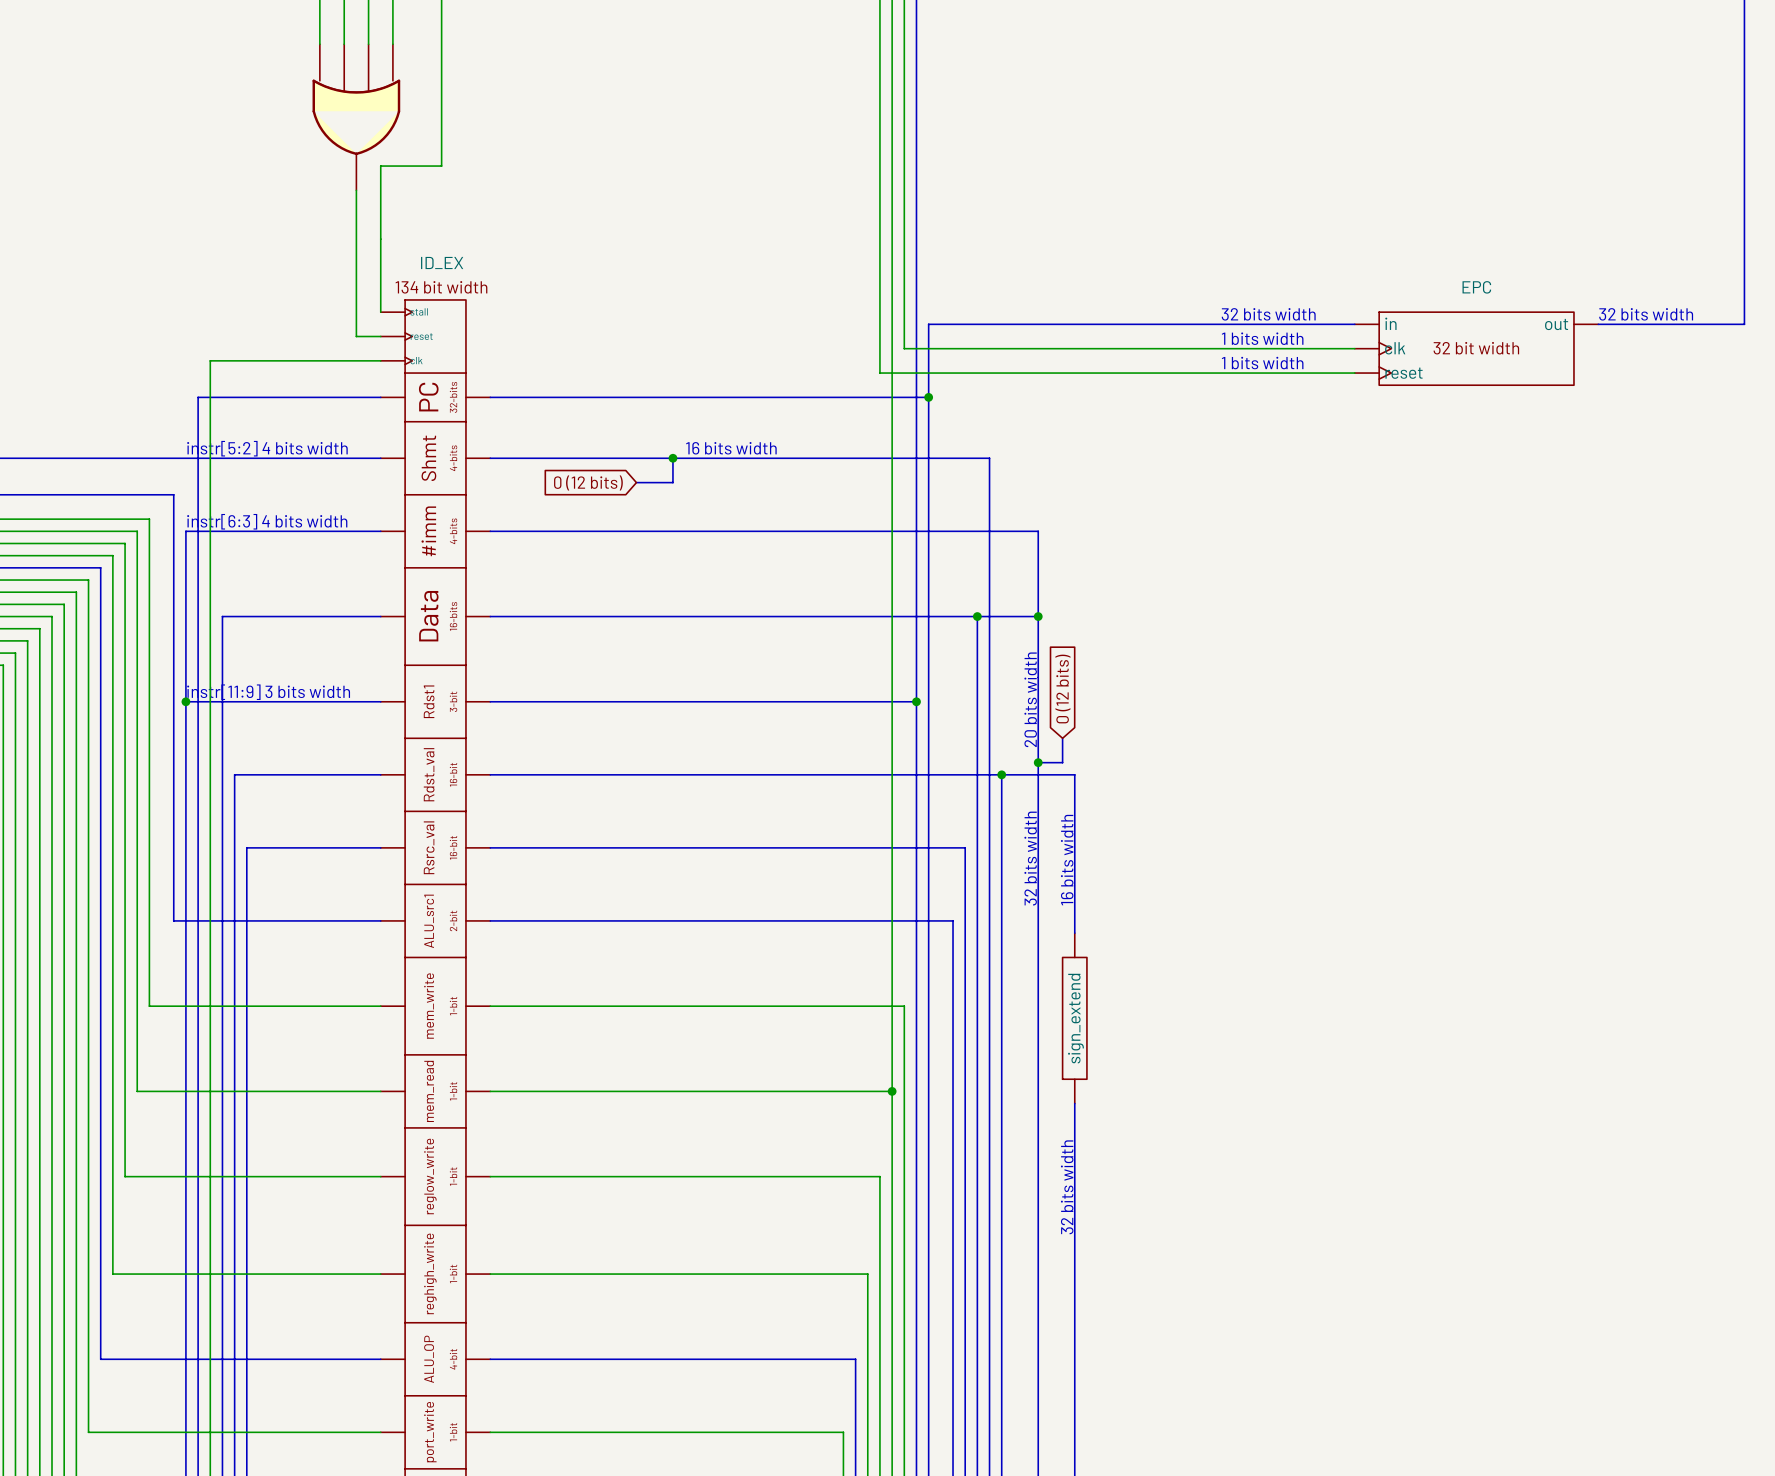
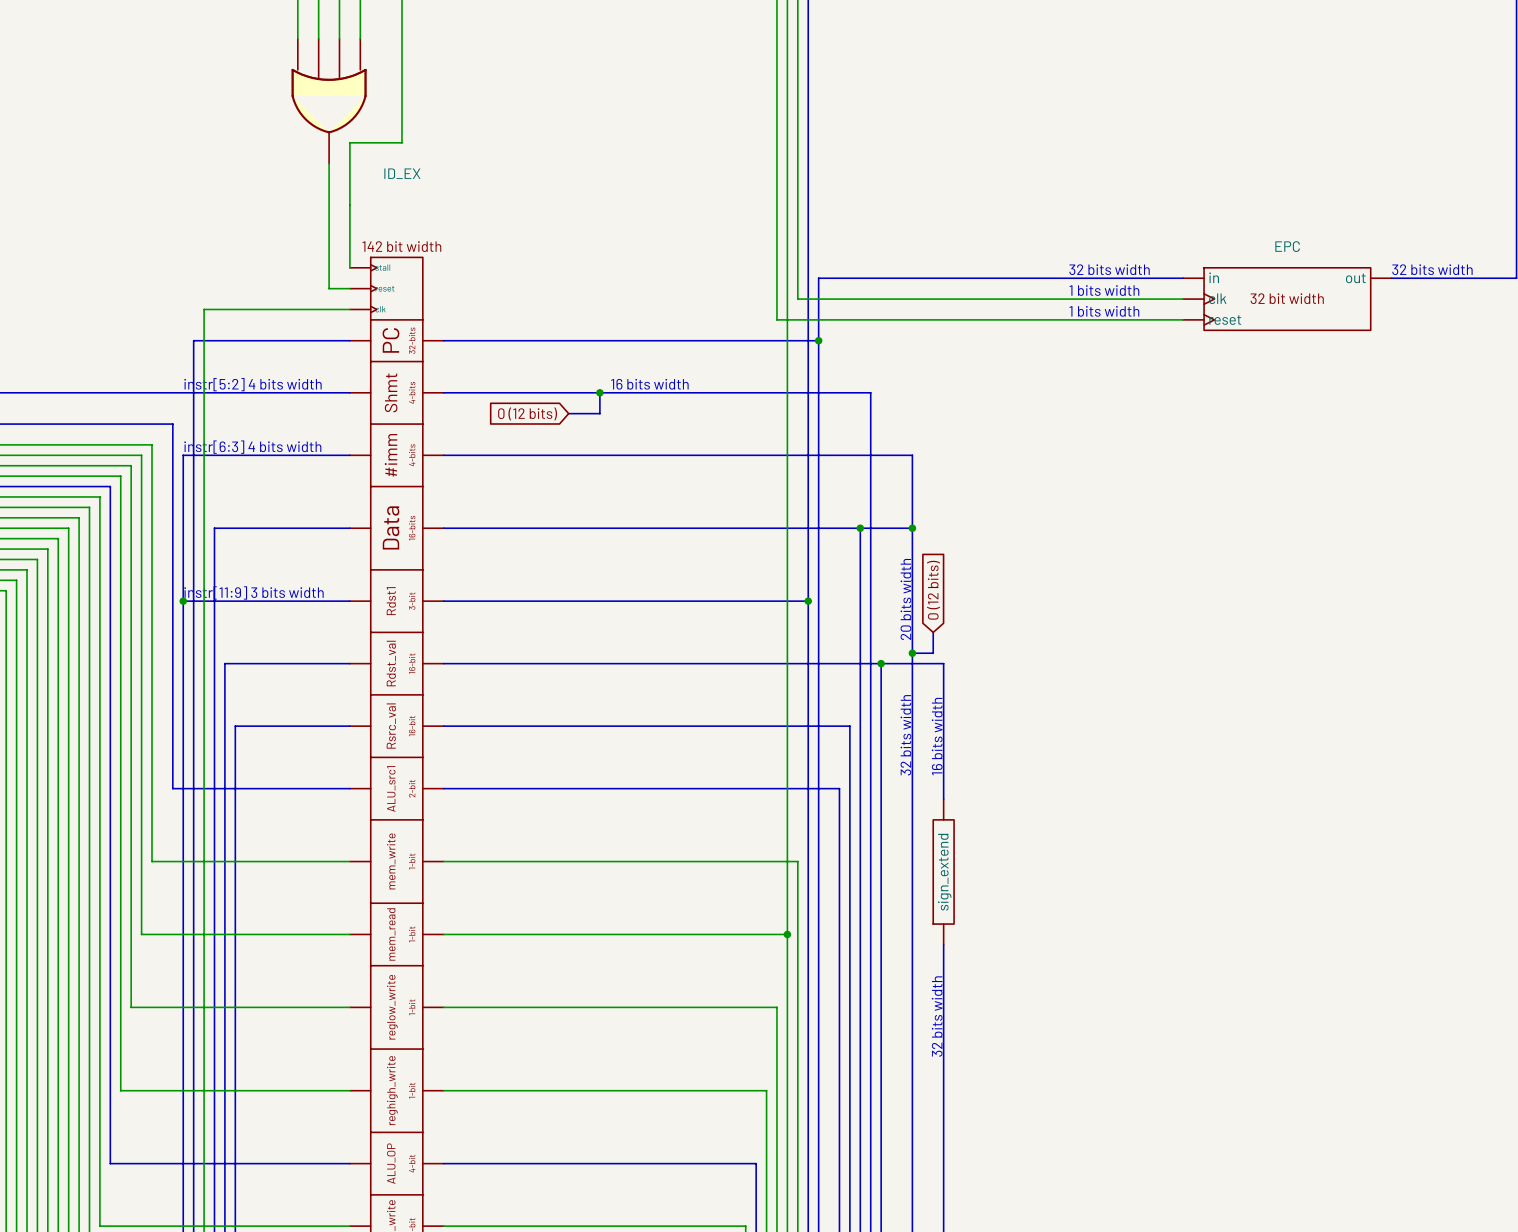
part value position: ID_EX (442, 262) -> ID_EX (402, 173)
part text: 134 bit width (441, 287) -> 142 bit width (401, 246)

